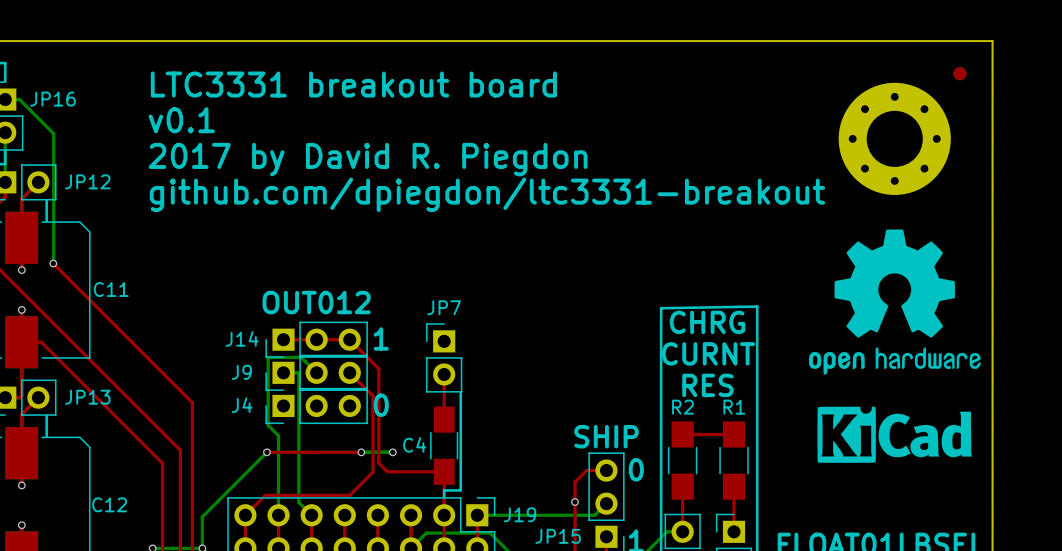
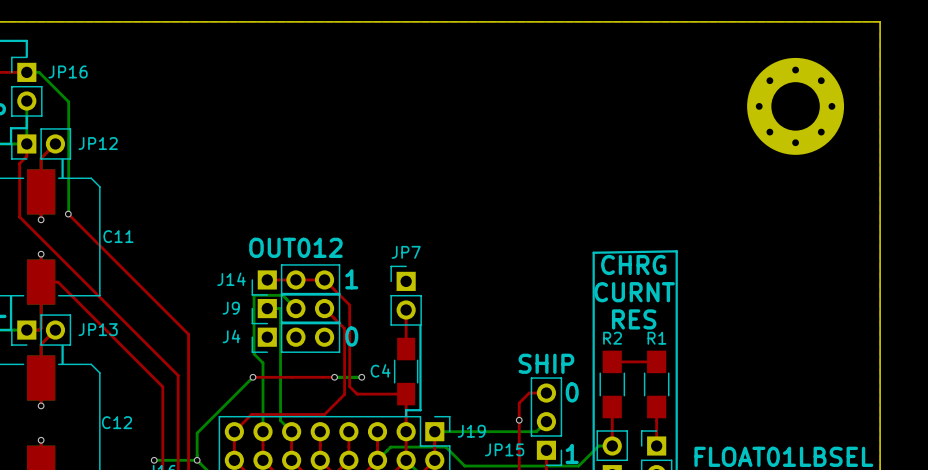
part: (959, 73) -> none
text: LTC3331 breakout board (353, 84) -> none
text: v0.1 (181, 120) -> none
text: 2017 by David R. Piegdon (368, 159) -> none
text: github.com/dpiegdon/ltc3331-breakout (487, 194) -> none
drawing: [809, 229, 981, 375] -> none
drawing: [817, 406, 973, 463] -> none

